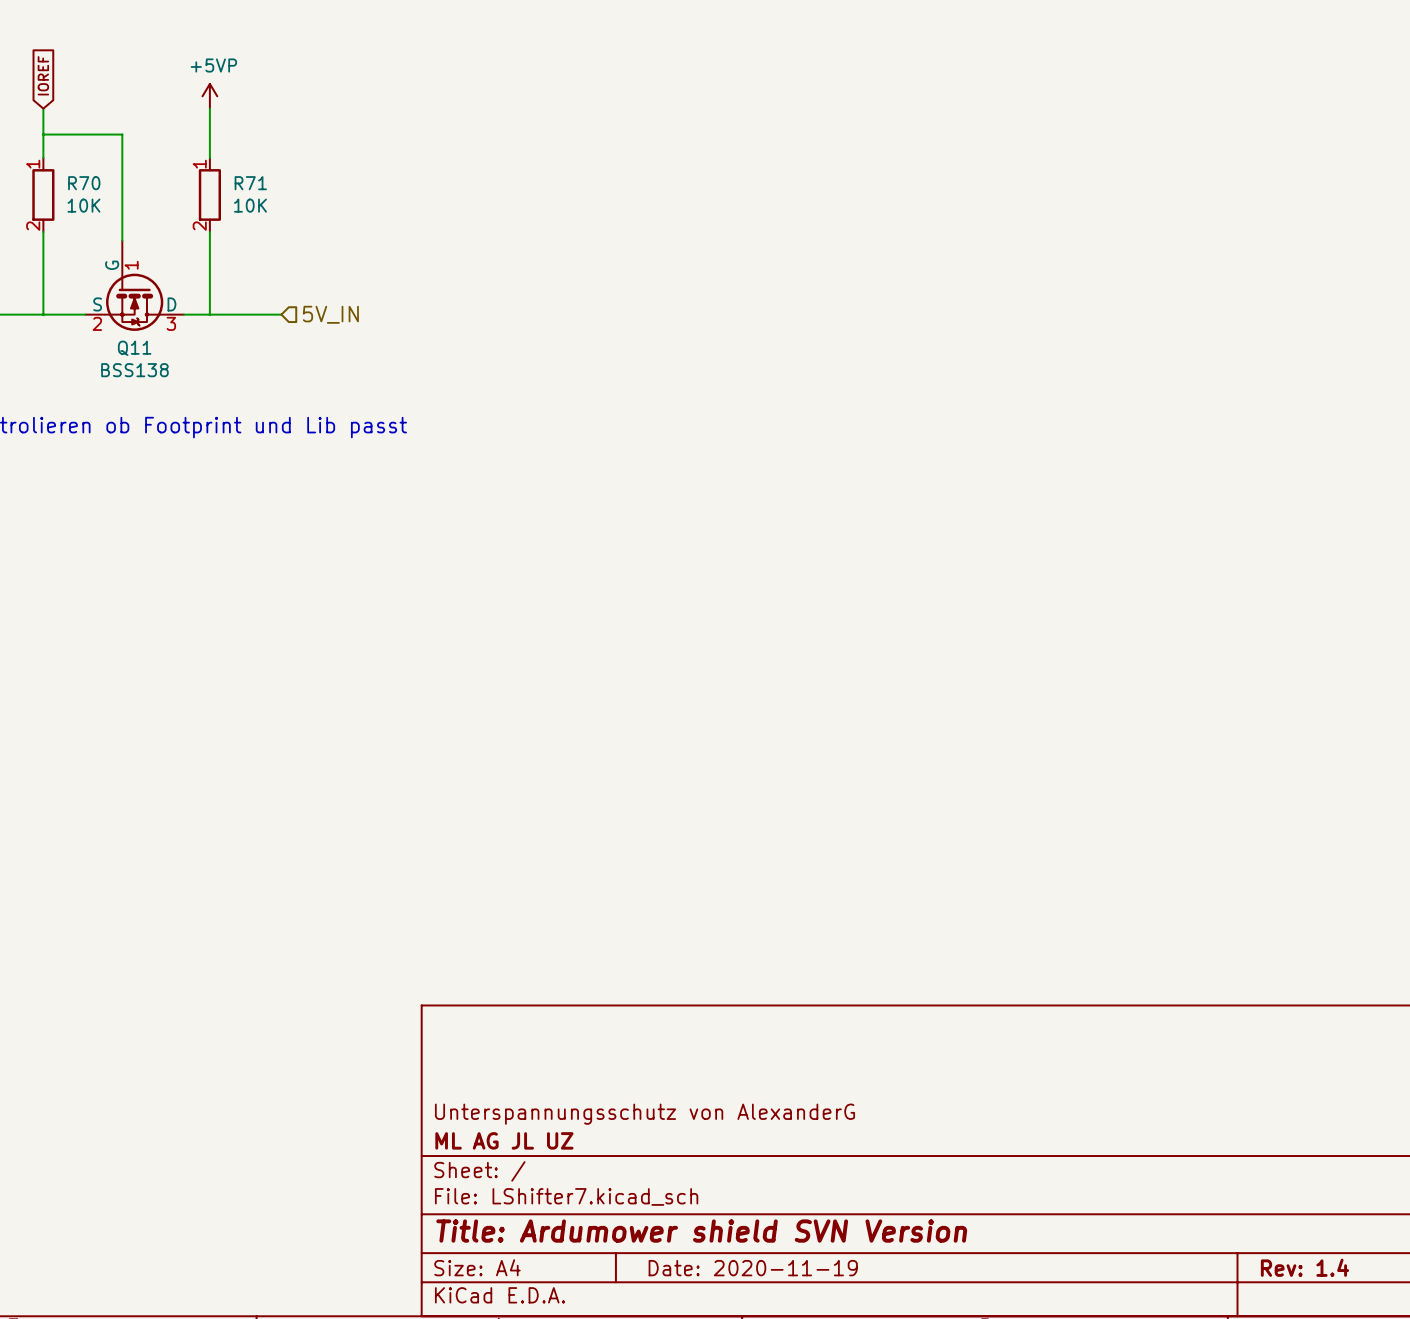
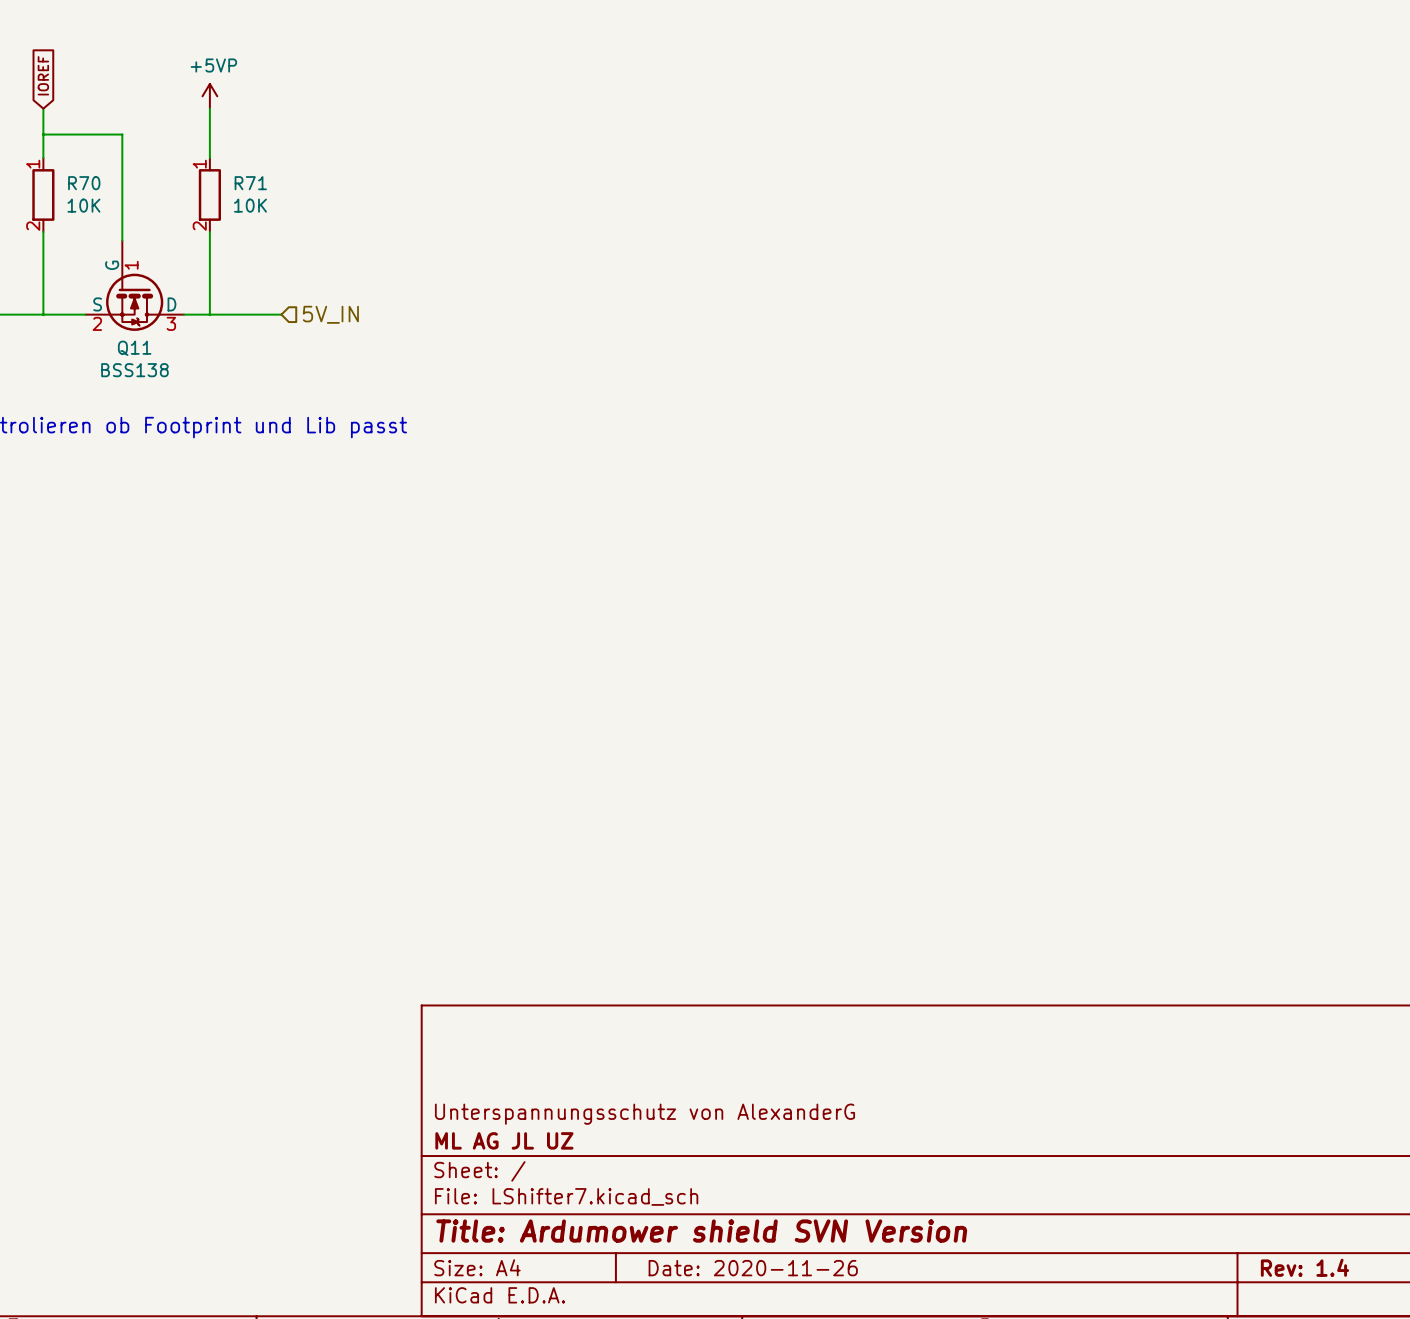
title block: Date: 2020-11-19 (753, 1268) -> Date: 2020-11-26 (753, 1268)

